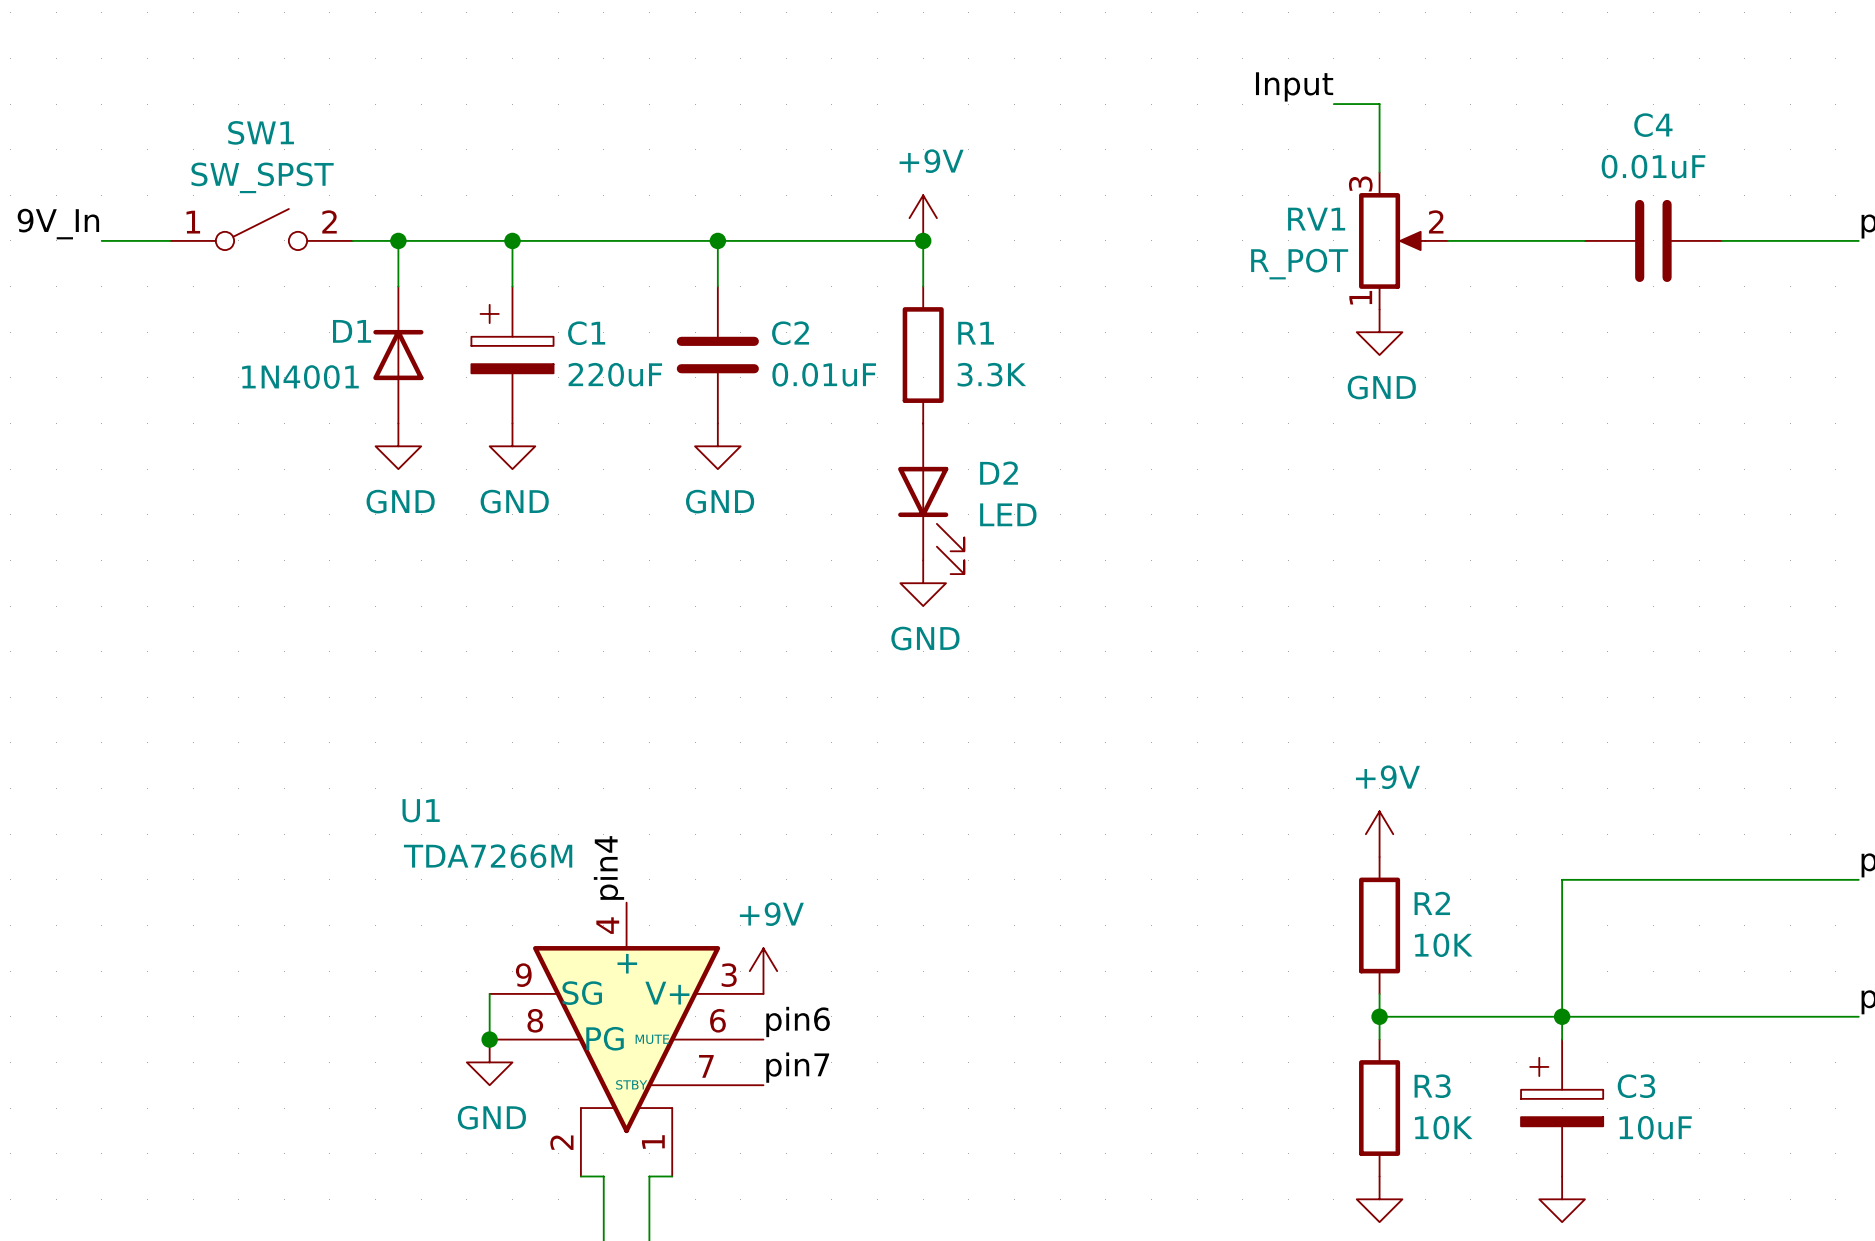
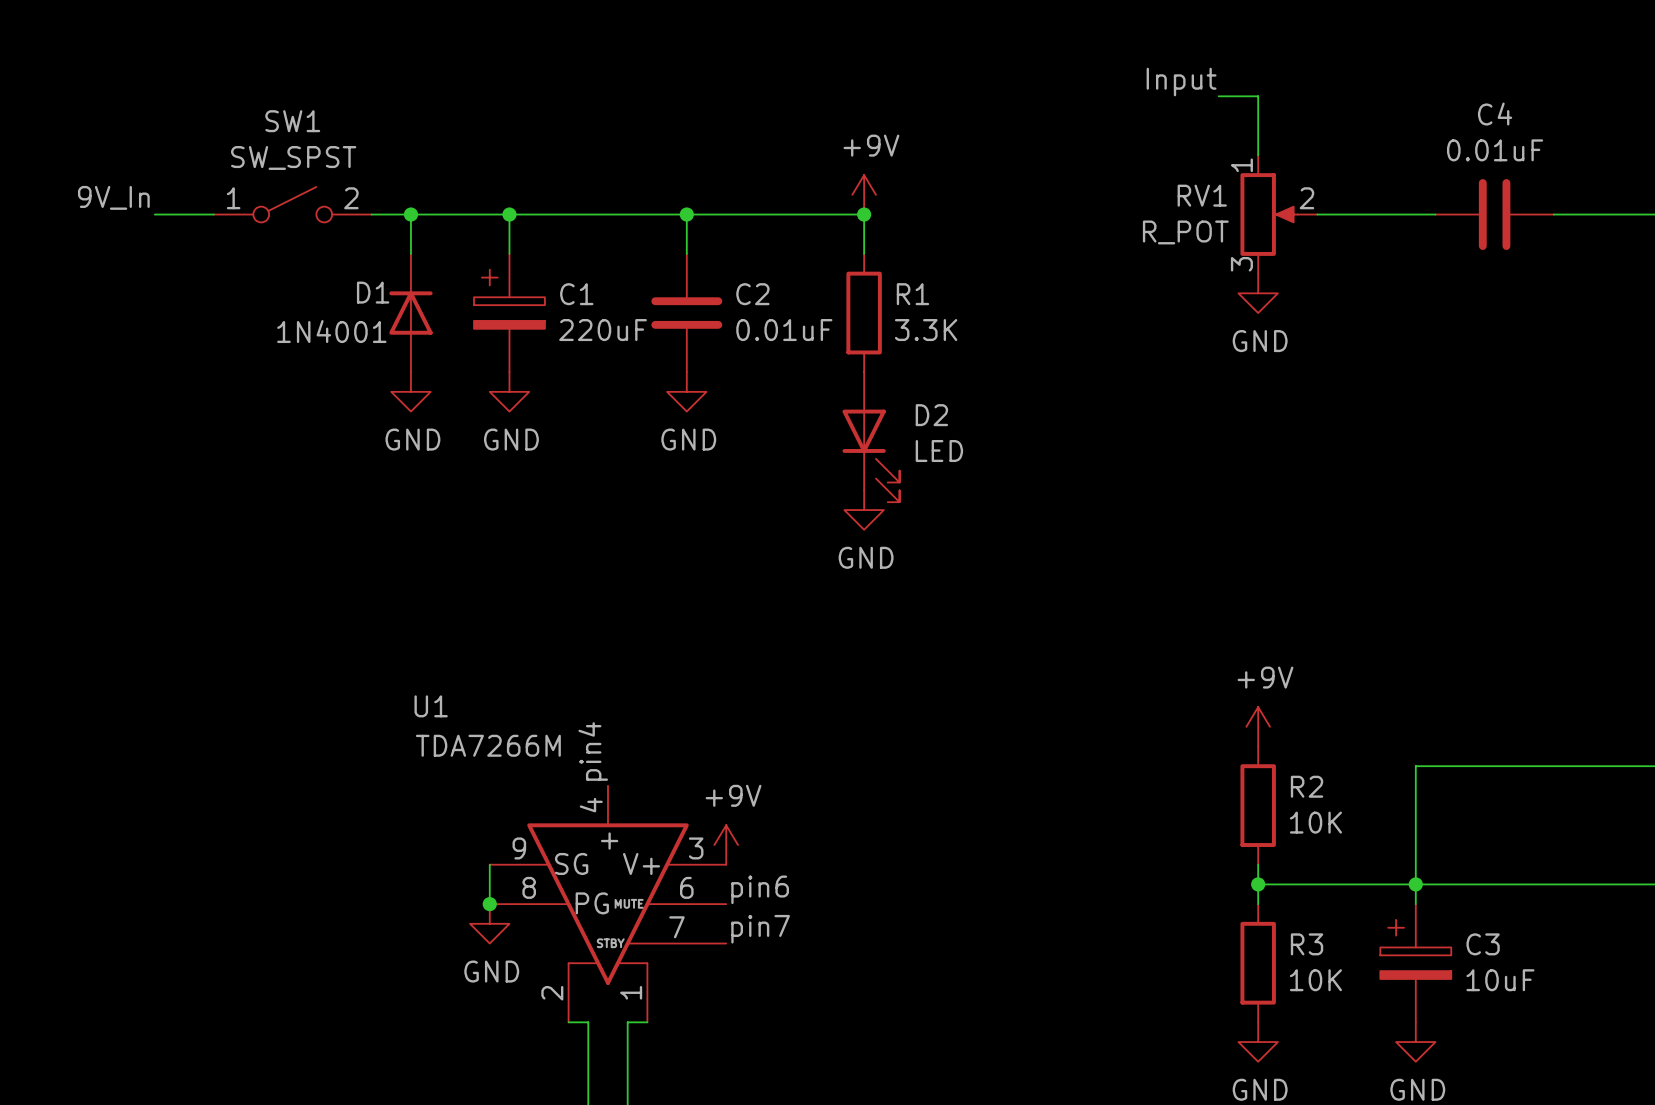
RV1 flip: as is (1392, 240) -> up-down (1269, 214)

